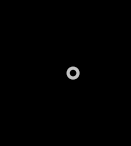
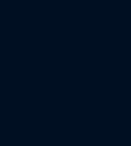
via: (73, 73) -> none

